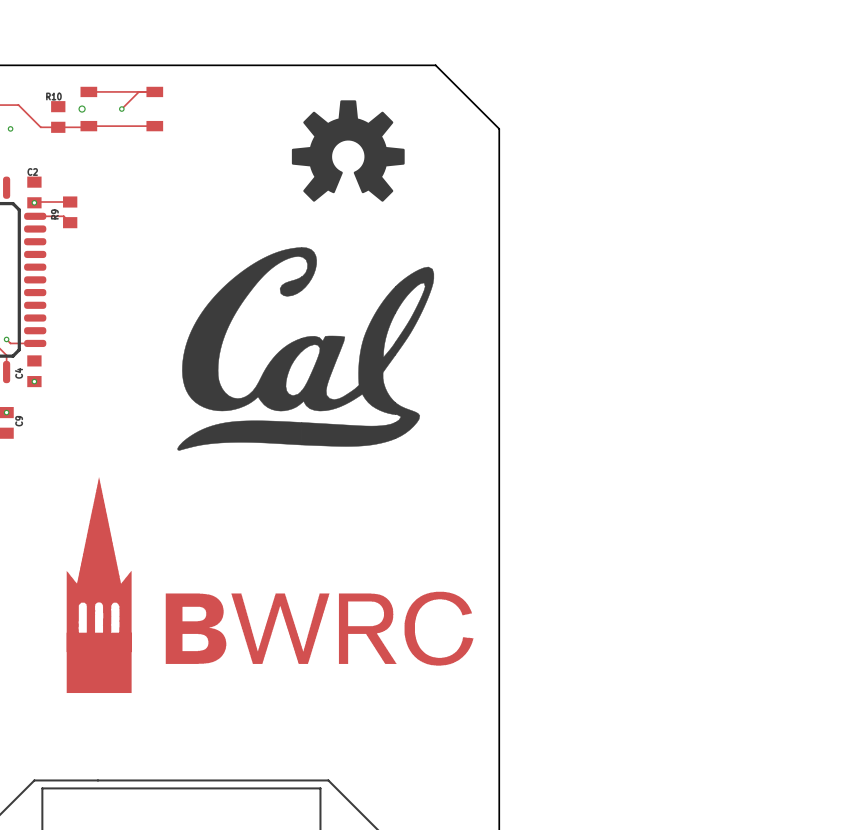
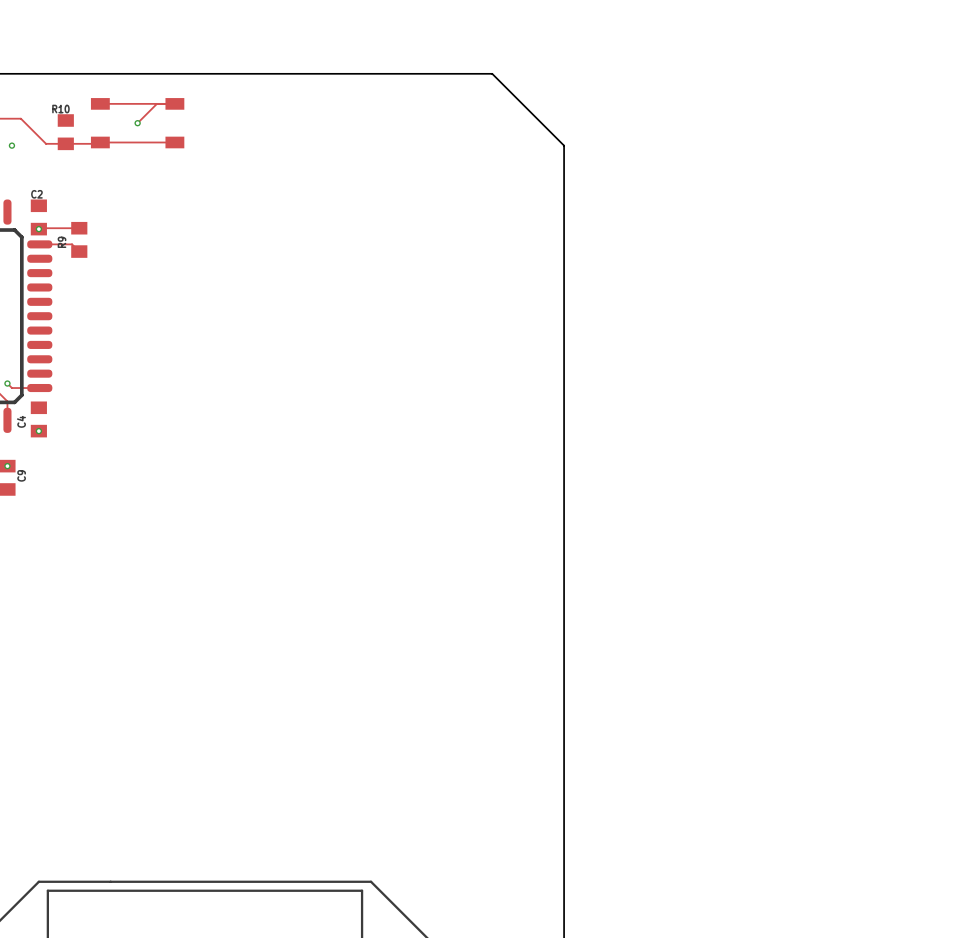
drawing: [291, 100, 405, 202] -> none
via: (82, 109) -> none
drawing: [177, 247, 435, 451] -> none
drawing: [66, 477, 132, 694] -> none
drawing: [165, 591, 474, 666] -> none

